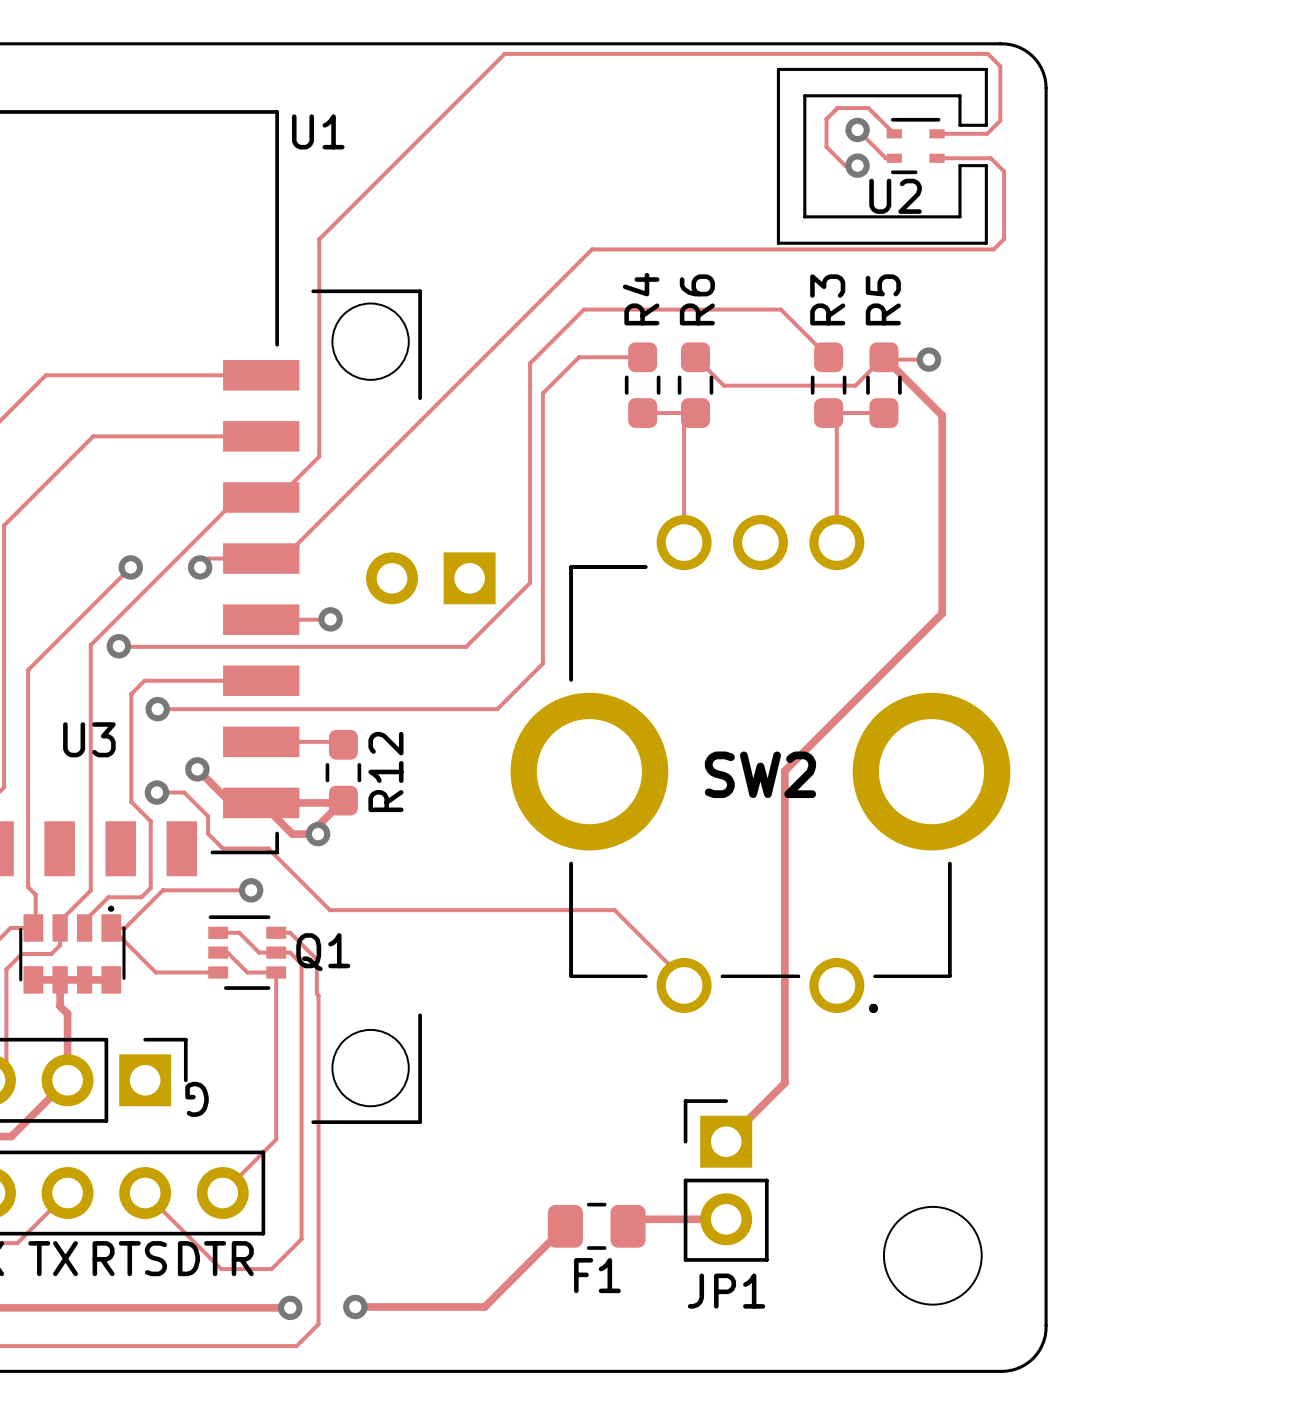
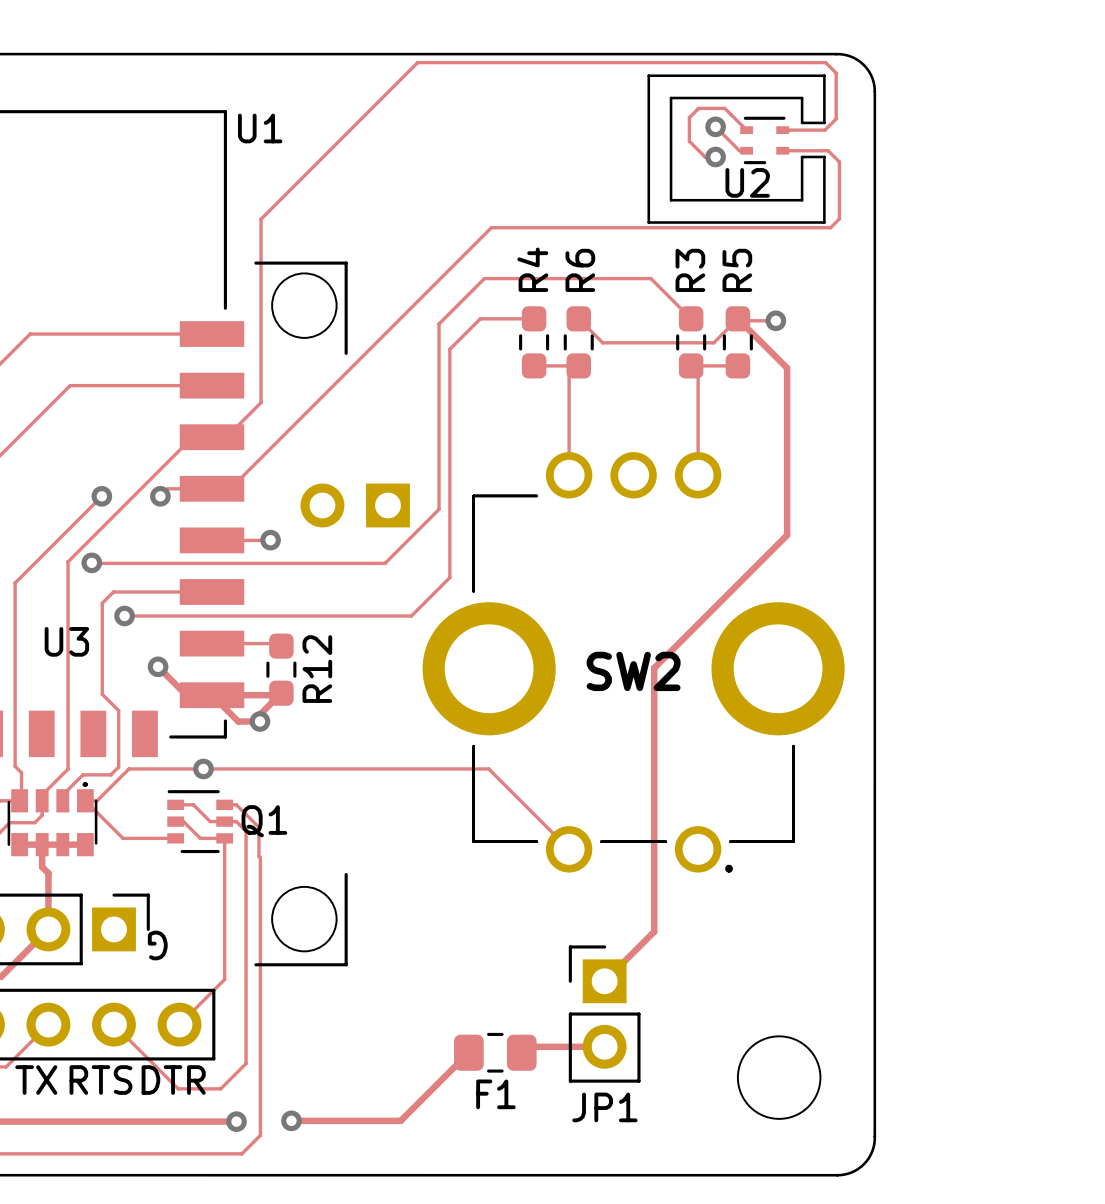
track: (156, 792) (184, 792) (208, 816) (208, 833) (222, 848) (268, 848) (329, 910) (614, 910) (684, 979) (684, 985) -> (203, 768) (488, 768) (569, 849)
via: (156, 792) -> none

